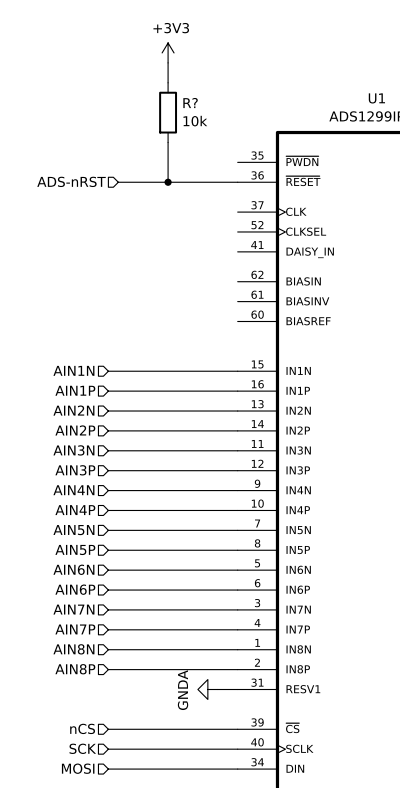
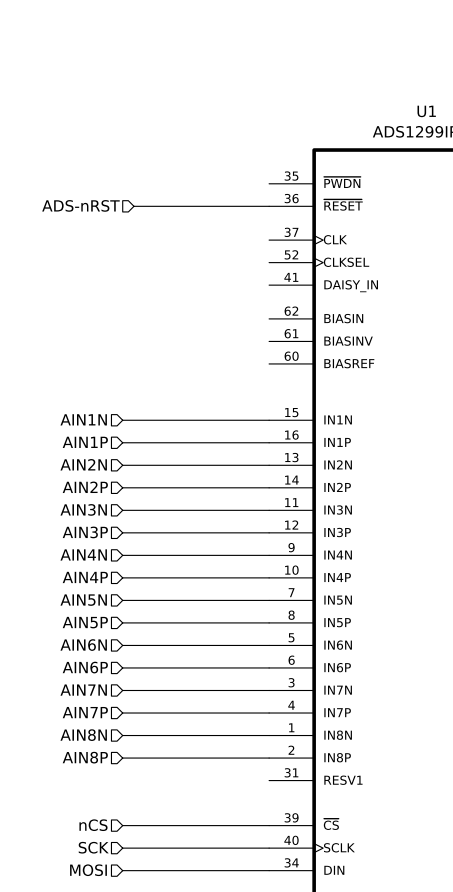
power symbol: +3V3 (168, 52) -> none
wire: (168, 62) (168, 82) -> none
R?: 10k (168, 112) -> none
wire: (168, 142) (168, 182) -> none
junction: (168, 182) -> none
power symbol: GNDA (207, 689) -> none
wire: (217, 689) (237, 689) -> none

